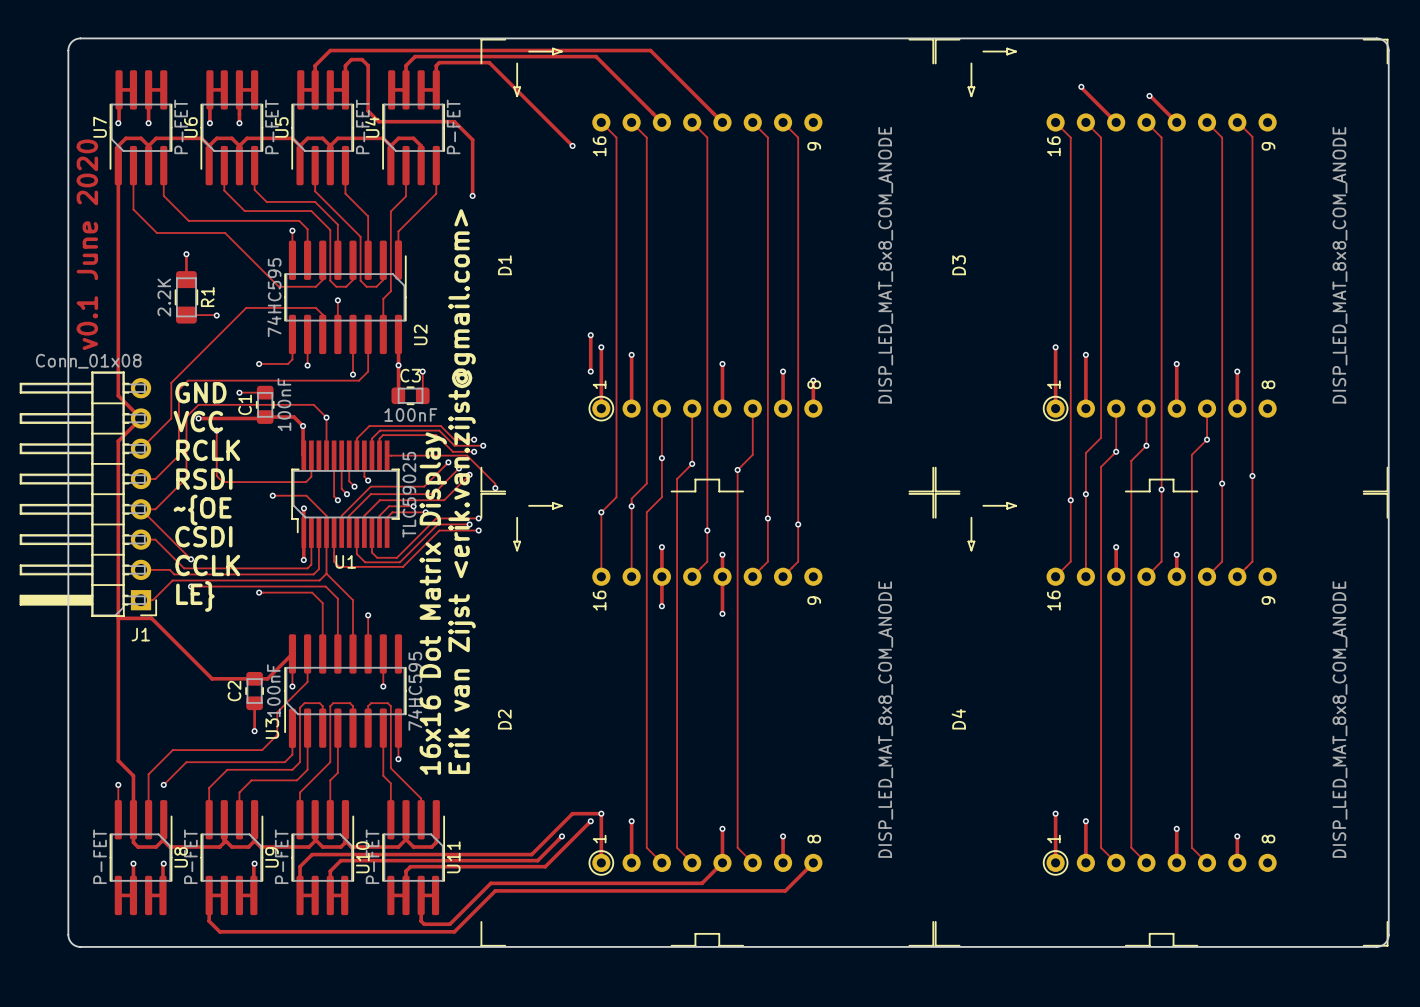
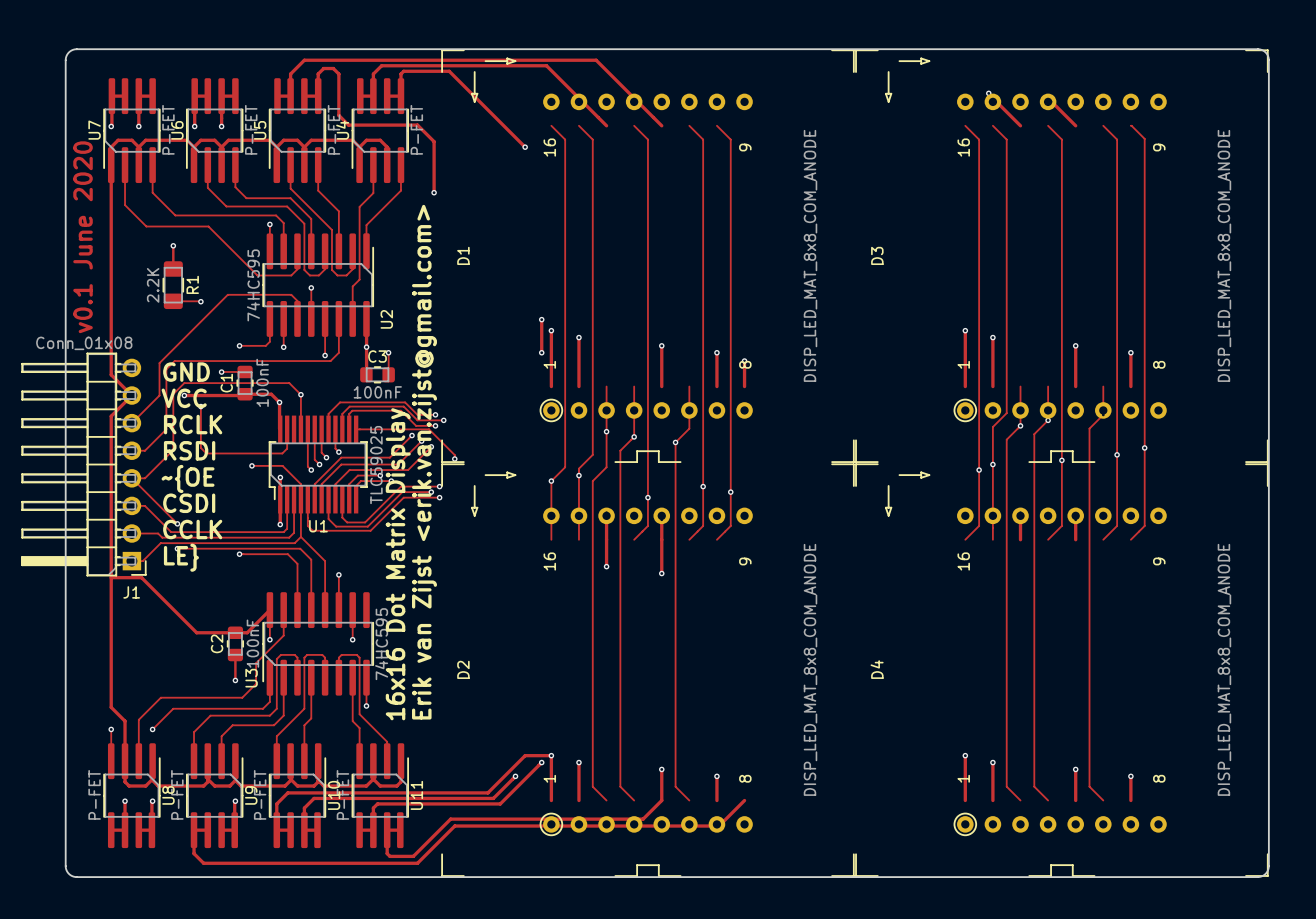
D1 footprint: [480, 38, 935, 493] -> [441, 49, 855, 463]
D3 footprint: [934, 38, 1389, 493] -> [855, 49, 1269, 463]
D4 footprint: [934, 492, 1389, 947] -> [855, 463, 1269, 877]
D2 footprint: [480, 493, 935, 947] -> [441, 463, 855, 877]

